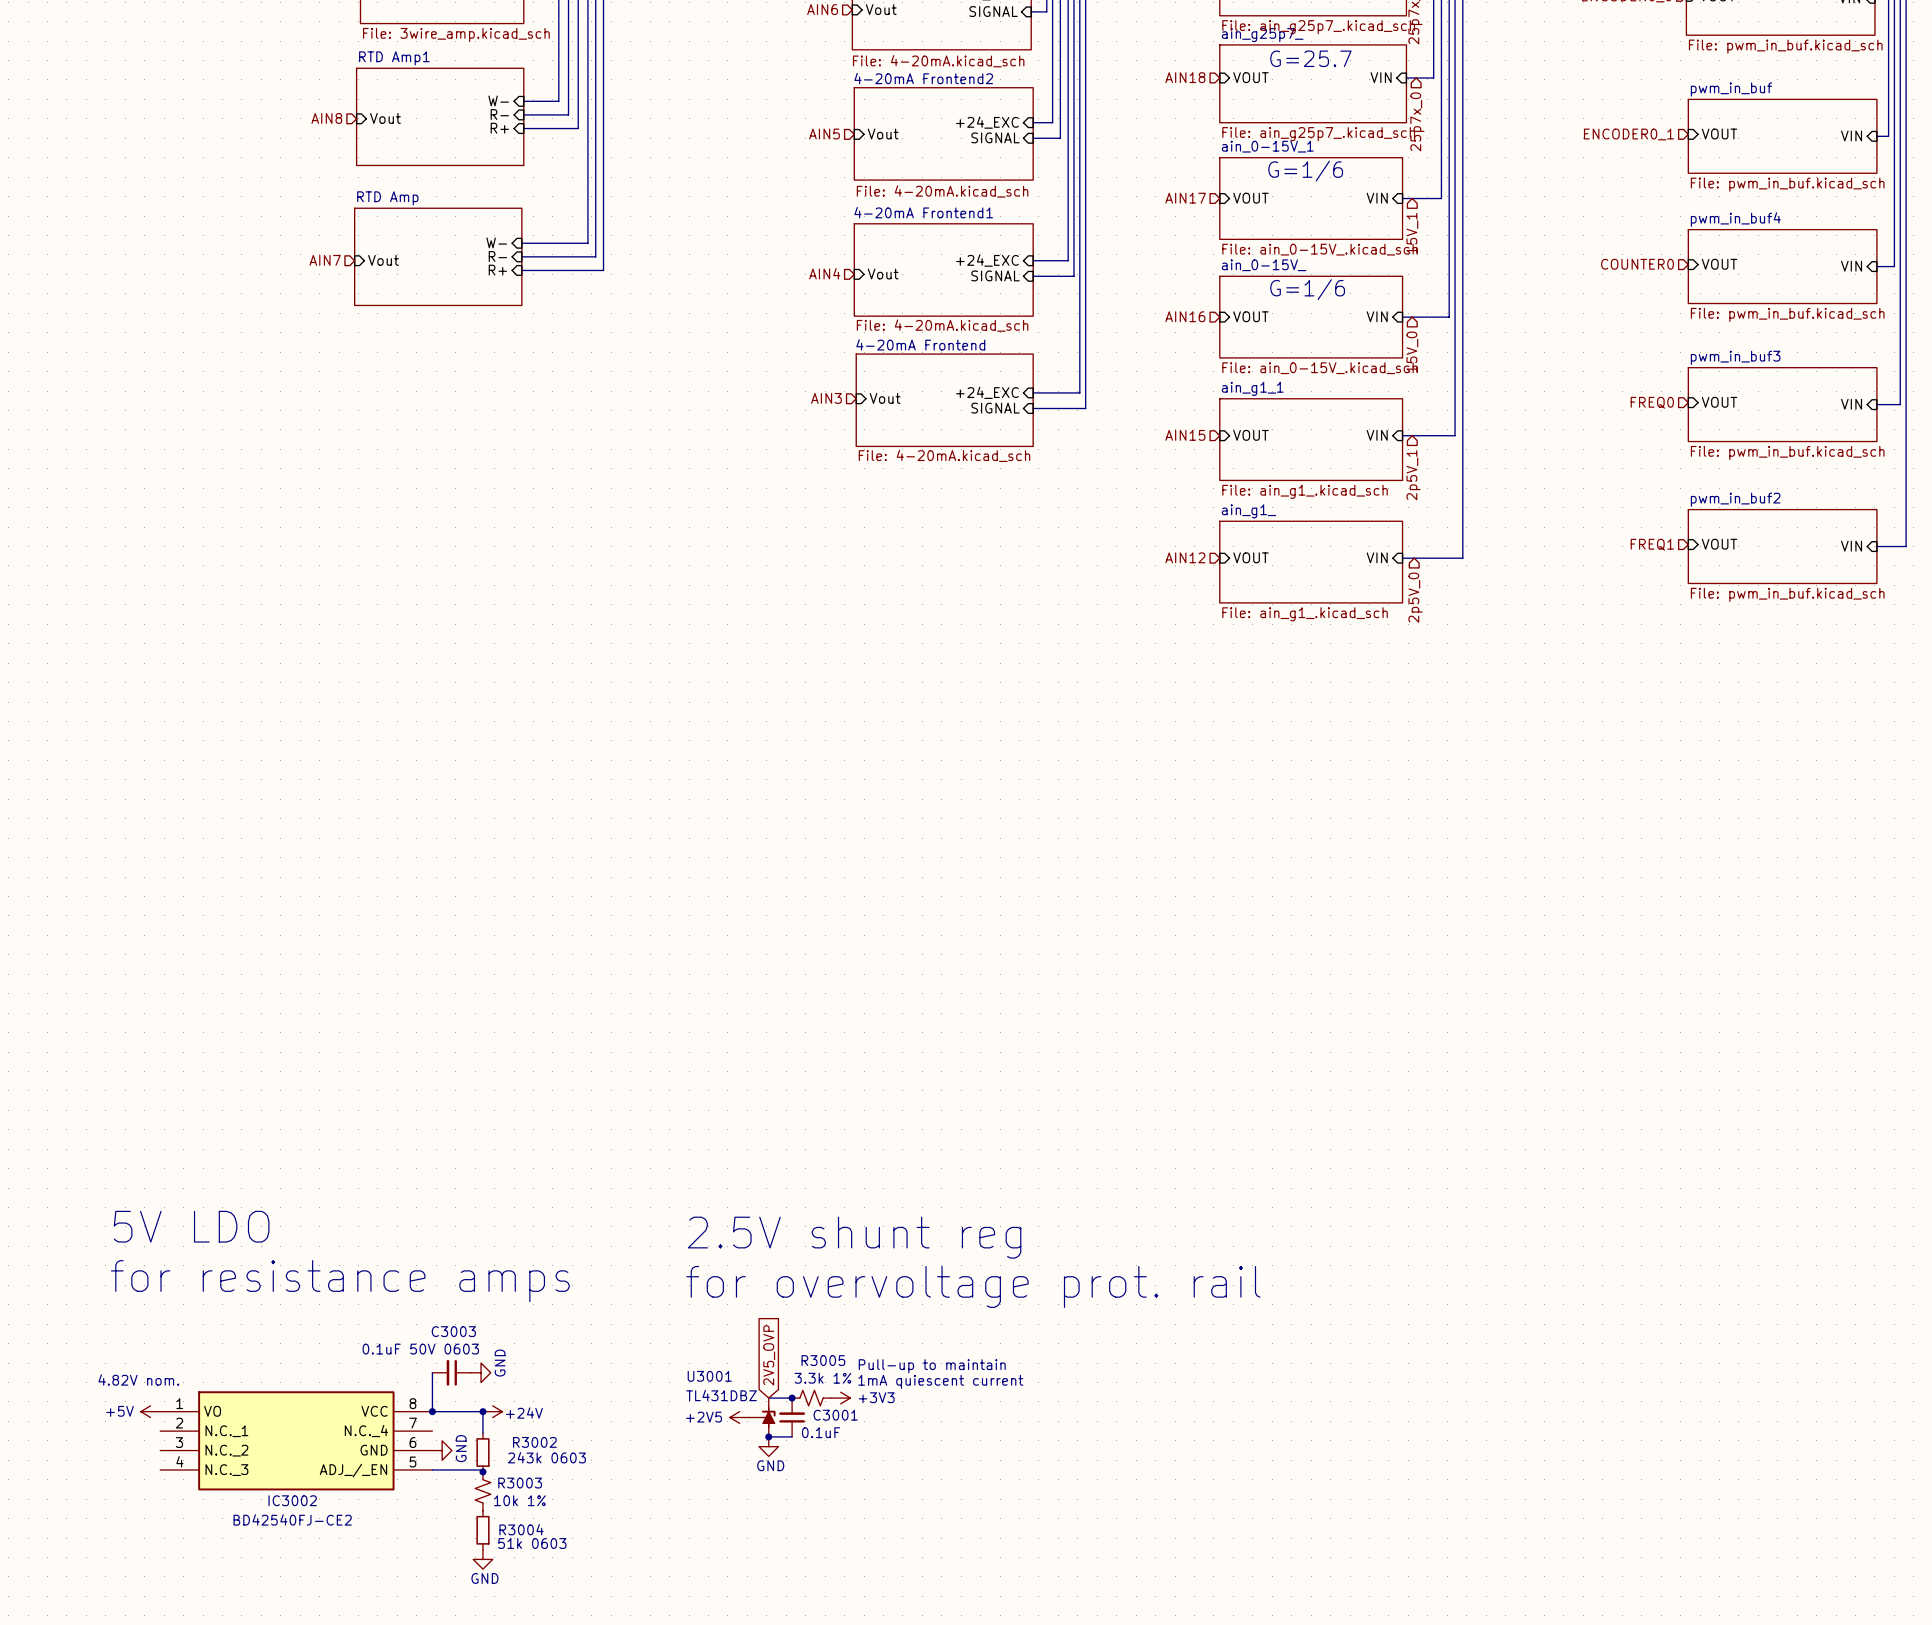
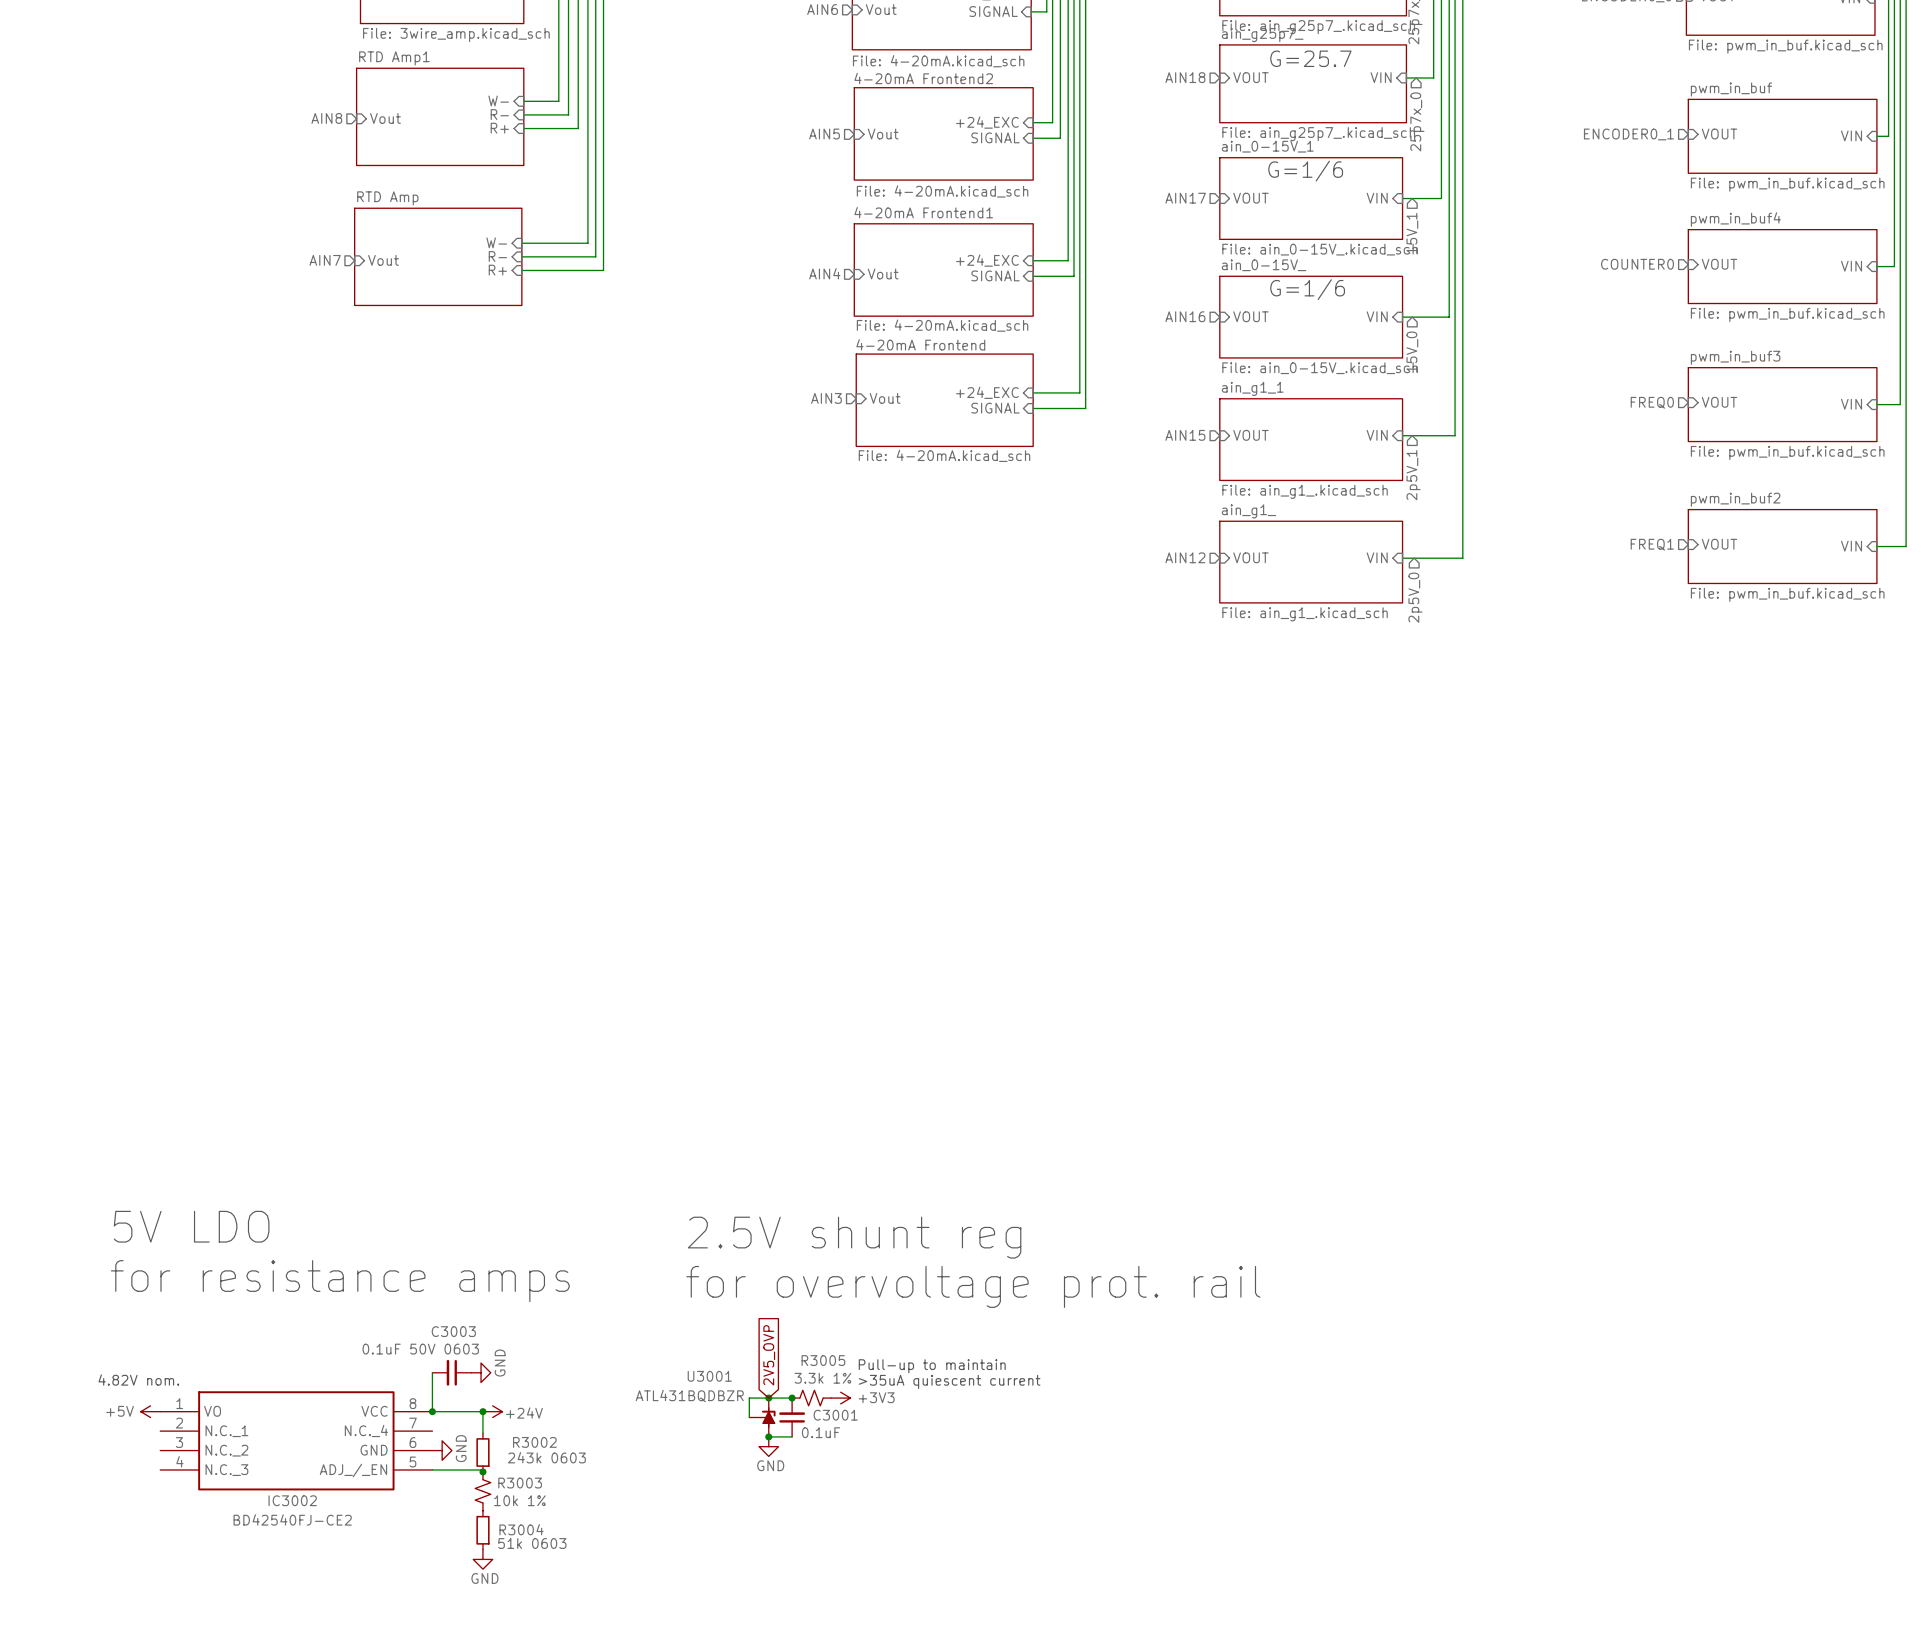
text: 1mA quiescent current (940, 1381) -> >35uA quiescent current (949, 1381)
U3001 value: TL431DBZ (721, 1395) -> ATL431BQDBZR (689, 1395)
wire: none -> (768, 1398) (749, 1398) (749, 1417)
junction: none -> (768, 1398)
power symbol: +2V5 (739, 1417) -> none

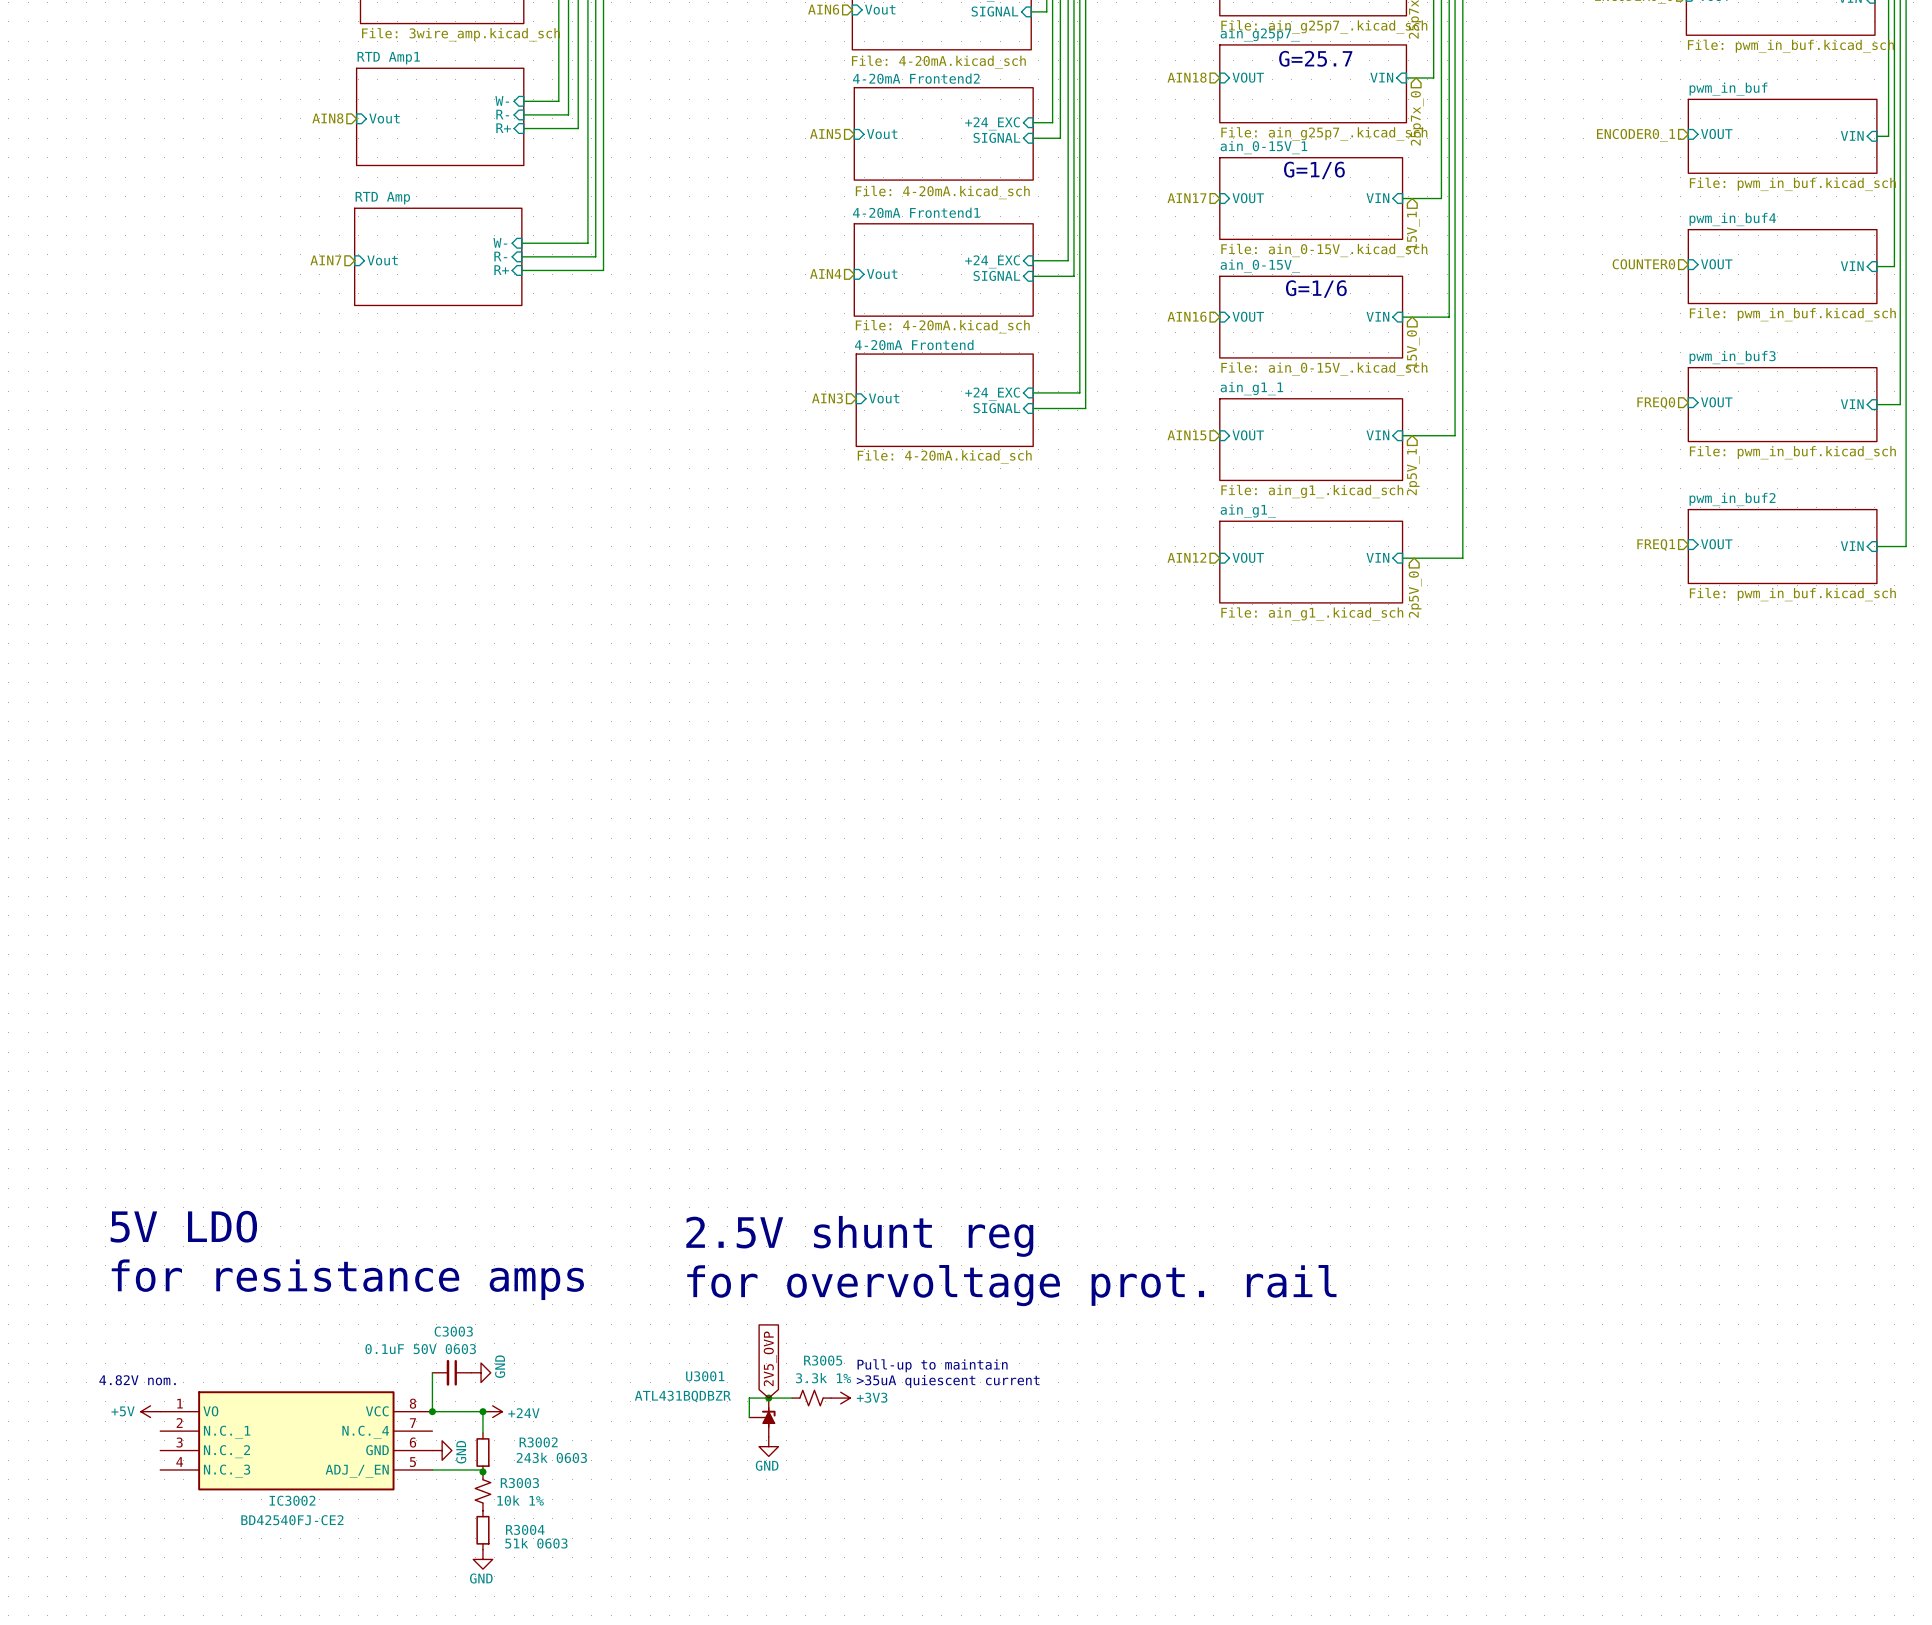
junction: (792, 1398) -> none
C3001: 0.1uF (792, 1417) -> none
wire: (768, 1436) (792, 1436) -> none
junction: (768, 1436) -> none

